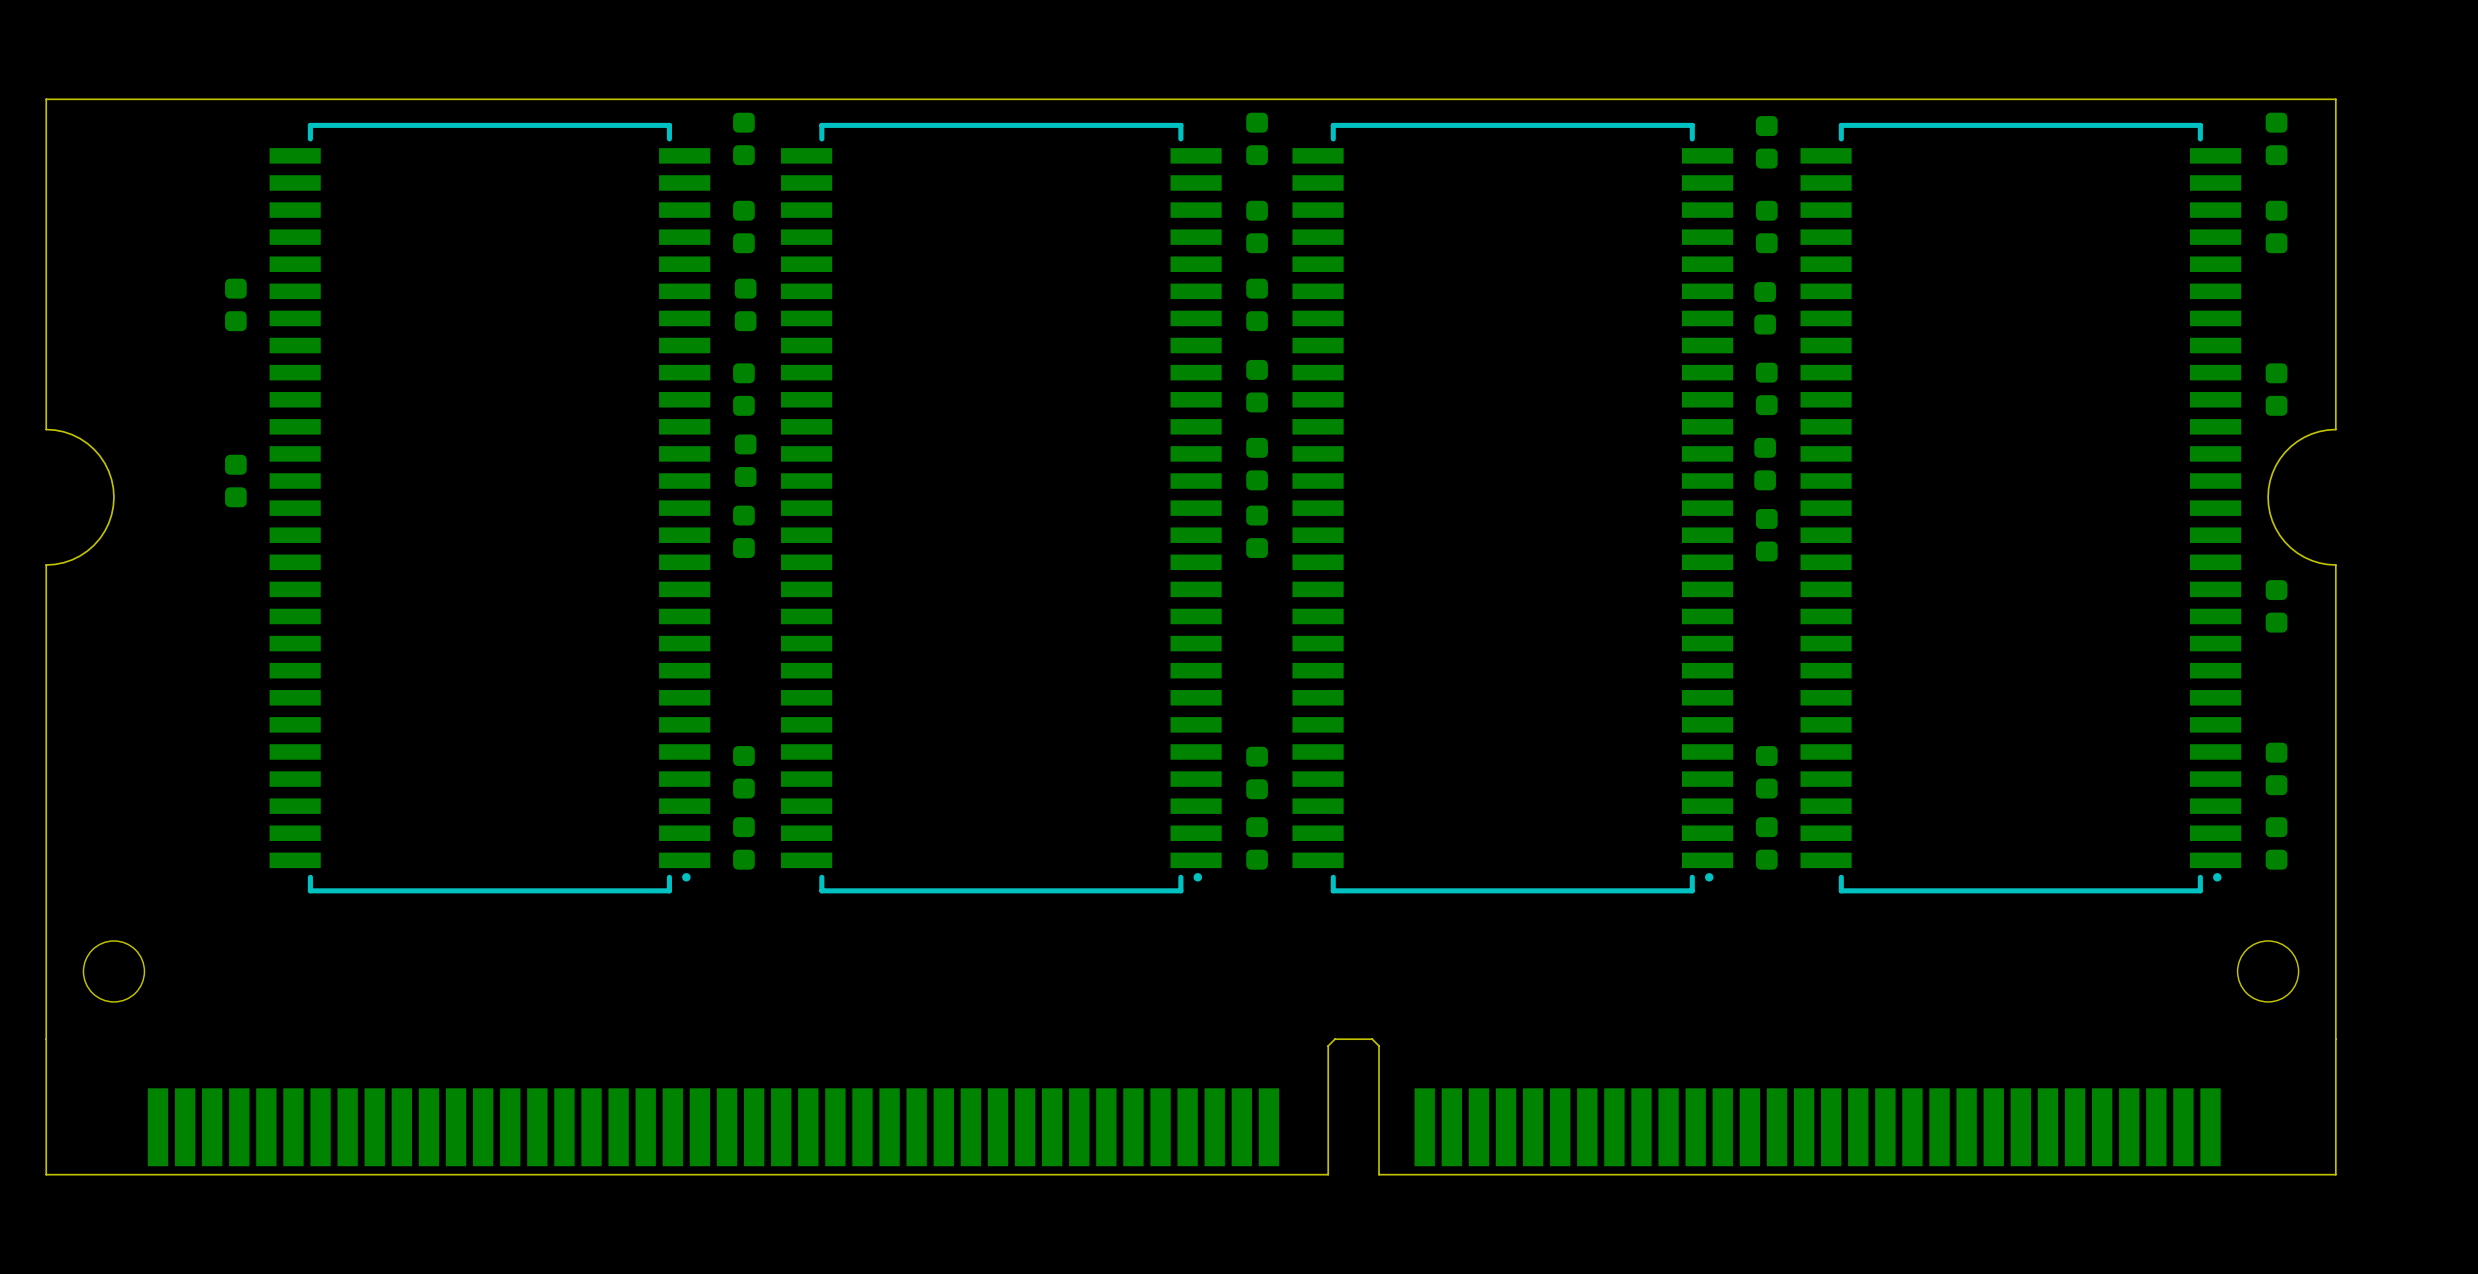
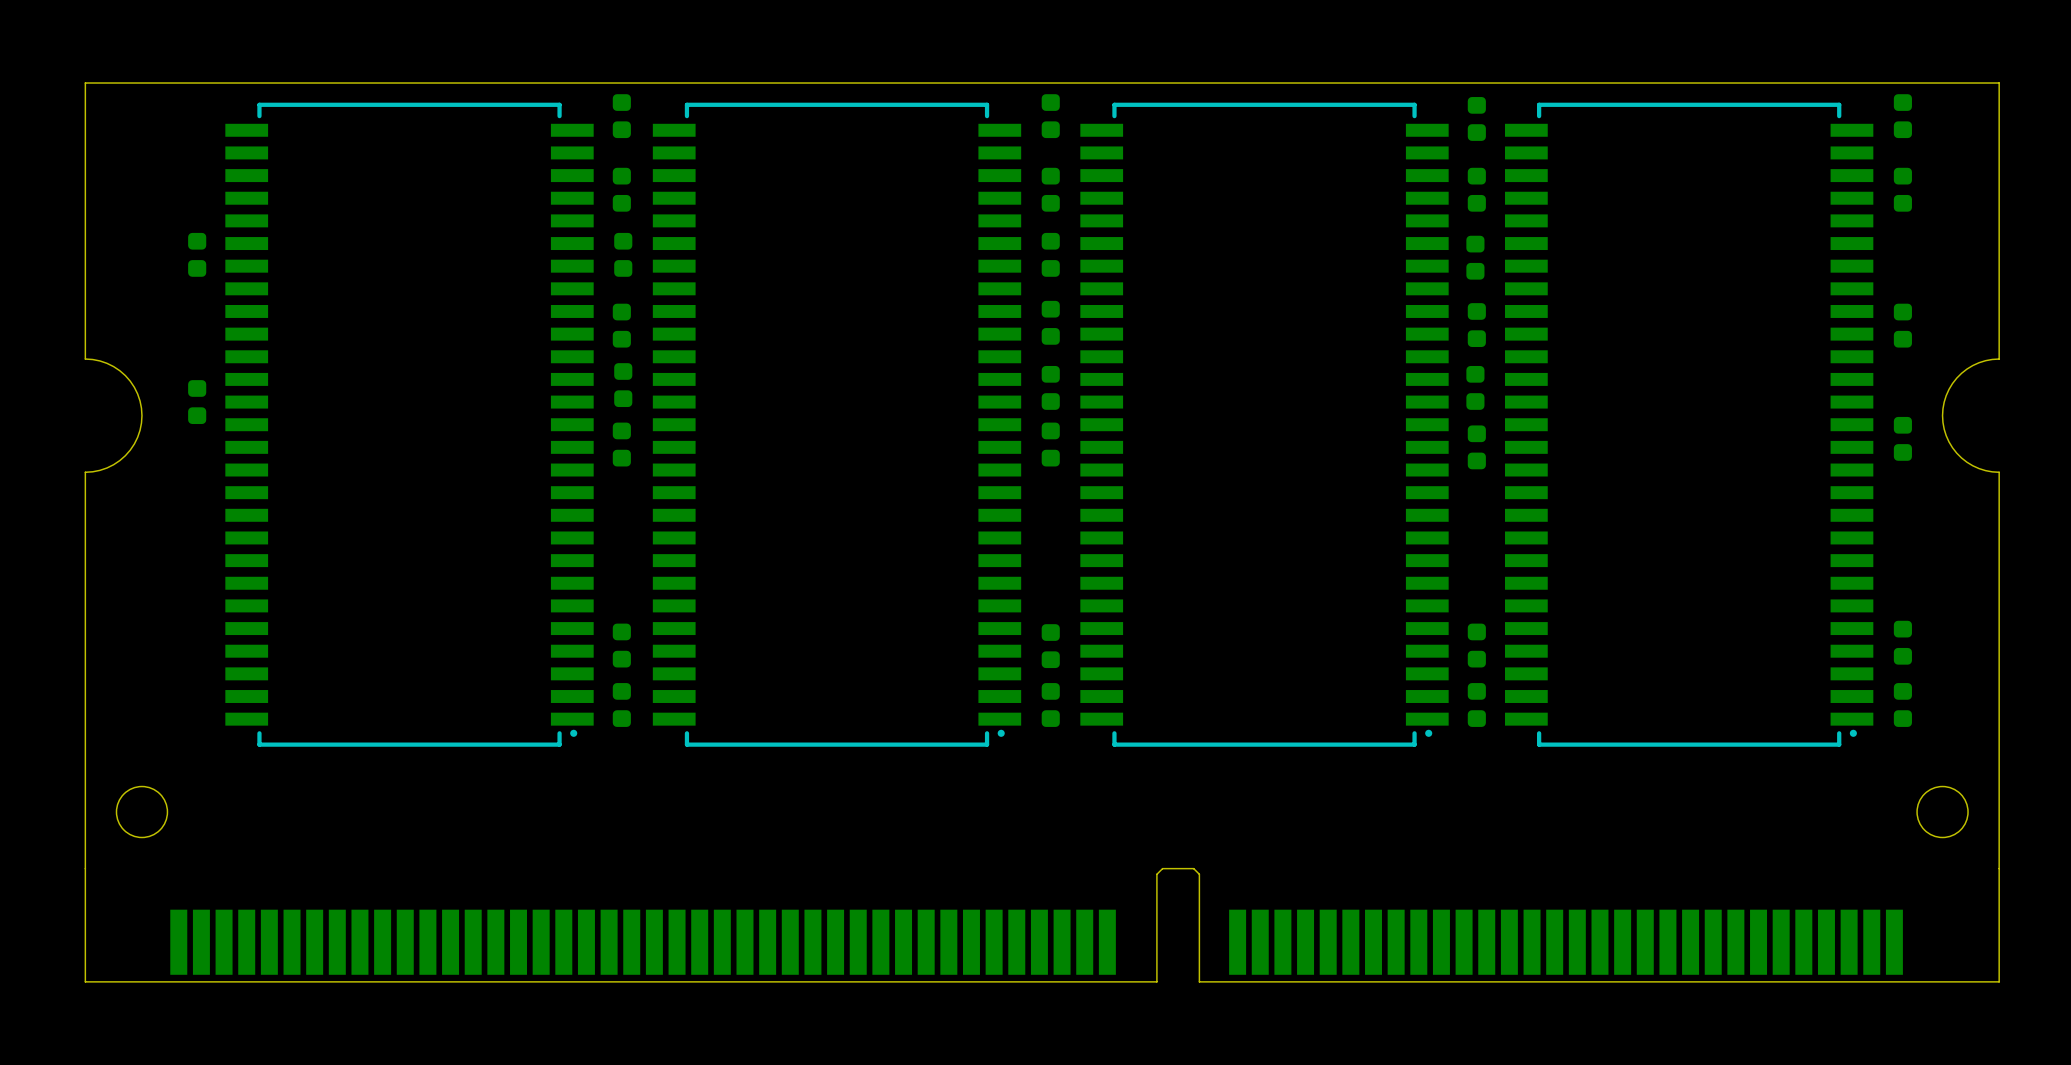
board edge: (102, 99) (46, 99) (46, 429) (72, 434) (94, 449) (108, 471) (113, 497) (108, 523) (94, 545) (72, 559) (46, 565) (46, 1039) -> (85, 83) (85, 359) (107, 363) (125, 375) (137, 393) (141, 415) (137, 437) (125, 455) (107, 467) (85, 472) (85, 868)
board edge: (2335, 99) (2335, 429) (2311, 433) (2290, 446) (2275, 465) (2270, 481) (2268, 497) (2272, 521) (2285, 542) (2304, 557) (2319, 563) (2335, 565) (2335, 1039) -> (1952, 83) (1999, 83) (1999, 359) (1979, 362) (1961, 373) (1949, 389) (1944, 402) (1942, 415) (1946, 435) (1956, 453) (1972, 465) (1985, 470) (1999, 472) (1999, 868)
part position: (2276, 606) -> (1902, 438)
part position: (1191, 1058) -> (1042, 884)

